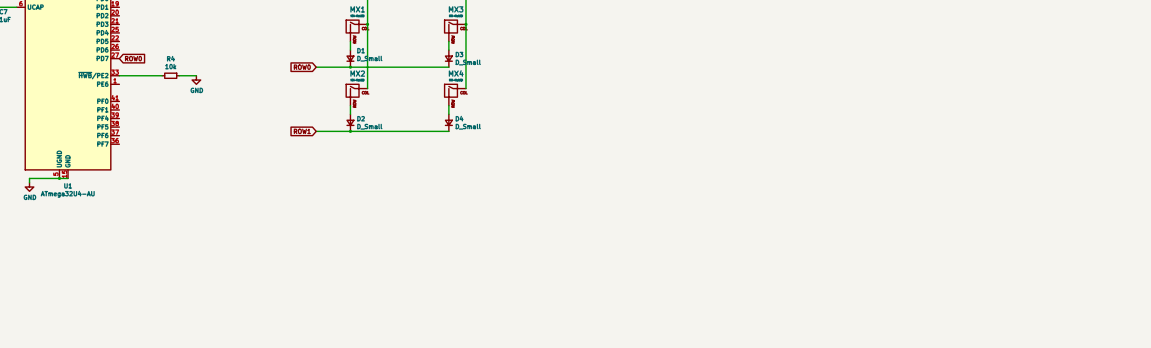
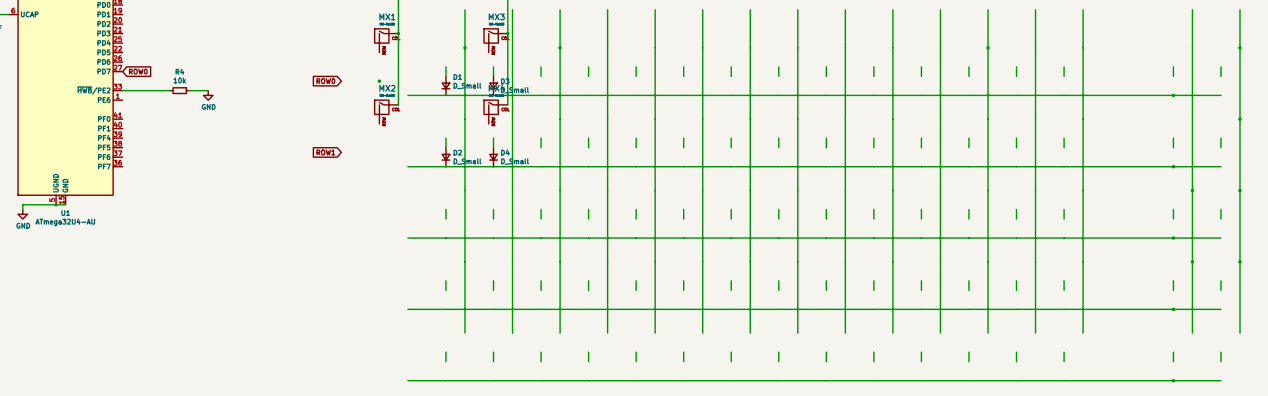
wire: none -> (464, 9) (464, 333)
wire: none -> (512, 9) (512, 333)
wire: none -> (560, 9) (560, 333)
wire: none -> (607, 9) (607, 333)
wire: none -> (655, 9) (655, 333)
wire: none -> (702, 9) (702, 333)
wire: none -> (750, 9) (750, 333)
wire: none -> (797, 9) (797, 333)
wire: none -> (845, 9) (845, 333)
wire: none -> (892, 9) (892, 333)
wire: none -> (940, 9) (940, 333)
wire: none -> (987, 9) (987, 333)
wire: none -> (1035, 9) (1035, 333)
wire: none -> (1083, 9) (1083, 333)
wire: none -> (1192, 9) (1192, 333)
wire: none -> (1239, 9) (1239, 333)
junction: none -> (464, 47)
junction: none -> (560, 47)
junction: none -> (987, 47)
junction: none -> (1239, 47)
wire: (350, 41) (350, 50) -> (445, 66) (445, 76)
wire: (448, 41) (448, 50) -> (493, 66) (493, 76)
wire: none -> (541, 66) (541, 76)
wire: none -> (588, 66) (588, 76)
wire: none -> (636, 66) (636, 76)
wire: none -> (683, 66) (683, 76)
wire: none -> (731, 66) (731, 76)
wire: none -> (778, 66) (778, 76)
wire: none -> (826, 66) (826, 76)
wire: none -> (873, 66) (873, 76)
wire: none -> (921, 66) (921, 76)
wire: none -> (968, 66) (968, 76)
wire: none -> (1016, 66) (1016, 76)
wire: none -> (1064, 66) (1064, 76)
wire: none -> (1173, 66) (1173, 76)
wire: none -> (1220, 66) (1220, 76)
part position: (350, 58) -> (445, 85)
part position: (448, 58) -> (493, 85)
wire: (316, 67) (448, 67) -> none
wire: none -> (407, 95) (1220, 95)
junction: none -> (1173, 95)
junction: none -> (1239, 119)
wire: (350, 105) (350, 114) -> (445, 138) (445, 147)
wire: (448, 105) (448, 114) -> (493, 138) (493, 147)
wire: none -> (541, 138) (541, 147)
wire: none -> (588, 138) (588, 147)
wire: none -> (636, 138) (636, 147)
wire: none -> (683, 138) (683, 147)
wire: none -> (731, 138) (731, 147)
wire: none -> (778, 138) (778, 147)
wire: none -> (826, 138) (826, 147)
wire: none -> (873, 138) (873, 147)
wire: none -> (921, 138) (921, 147)
wire: none -> (968, 138) (968, 147)
wire: none -> (1016, 138) (1016, 147)
wire: none -> (1064, 138) (1064, 147)
wire: none -> (1173, 138) (1173, 147)
wire: none -> (1220, 138) (1220, 147)
part position: (350, 122) -> (445, 157)
part position: (448, 122) -> (493, 157)
wire: (316, 131) (448, 131) -> none
junction: (350, 131) -> none
wire: none -> (407, 166) (1220, 166)
junction: none -> (1173, 166)
junction: none -> (1192, 190)
junction: none -> (1239, 190)
wire: none -> (445, 209) (445, 219)
wire: none -> (493, 209) (493, 219)
wire: none -> (541, 209) (541, 219)
wire: none -> (588, 209) (588, 219)
wire: none -> (636, 209) (636, 219)
wire: none -> (683, 209) (683, 219)
wire: none -> (731, 209) (731, 219)
wire: none -> (778, 209) (778, 219)
wire: none -> (826, 209) (826, 219)
wire: none -> (873, 209) (873, 219)
wire: none -> (921, 209) (921, 219)
wire: none -> (968, 209) (968, 219)
wire: none -> (1016, 209) (1016, 219)
wire: none -> (1064, 209) (1064, 219)
wire: none -> (1173, 209) (1173, 219)
wire: none -> (1220, 209) (1220, 219)
wire: none -> (407, 238) (1220, 238)
junction: none -> (1173, 238)
junction: none -> (1192, 261)
junction: none -> (1239, 261)
wire: none -> (445, 280) (445, 290)
wire: none -> (493, 280) (493, 290)
wire: none -> (541, 280) (541, 290)
wire: none -> (588, 280) (588, 290)
wire: none -> (636, 280) (636, 290)
wire: none -> (683, 280) (683, 290)
wire: none -> (731, 280) (731, 290)
wire: none -> (778, 280) (778, 290)
wire: none -> (826, 280) (826, 290)
wire: none -> (873, 280) (873, 290)
wire: none -> (921, 280) (921, 290)
wire: none -> (968, 280) (968, 290)
wire: none -> (1016, 280) (1016, 290)
wire: none -> (1064, 280) (1064, 290)
wire: none -> (1173, 280) (1173, 290)
wire: none -> (1220, 280) (1220, 290)
wire: none -> (407, 309) (1220, 309)
junction: none -> (1173, 309)
wire: none -> (445, 352) (445, 361)
wire: none -> (493, 352) (493, 361)
wire: none -> (541, 352) (541, 361)
wire: none -> (588, 352) (588, 361)
wire: none -> (636, 352) (636, 361)
wire: none -> (683, 352) (683, 361)
wire: none -> (731, 352) (731, 361)
wire: none -> (778, 352) (778, 361)
wire: none -> (826, 352) (826, 361)
wire: none -> (873, 352) (873, 361)
wire: none -> (921, 352) (921, 361)
wire: none -> (968, 352) (968, 361)
wire: none -> (1016, 352) (1016, 361)
wire: none -> (1064, 352) (1064, 361)
wire: none -> (1173, 352) (1173, 361)
wire: none -> (1220, 352) (1220, 361)
wire: none -> (407, 380) (1220, 380)
junction: none -> (1173, 380)

